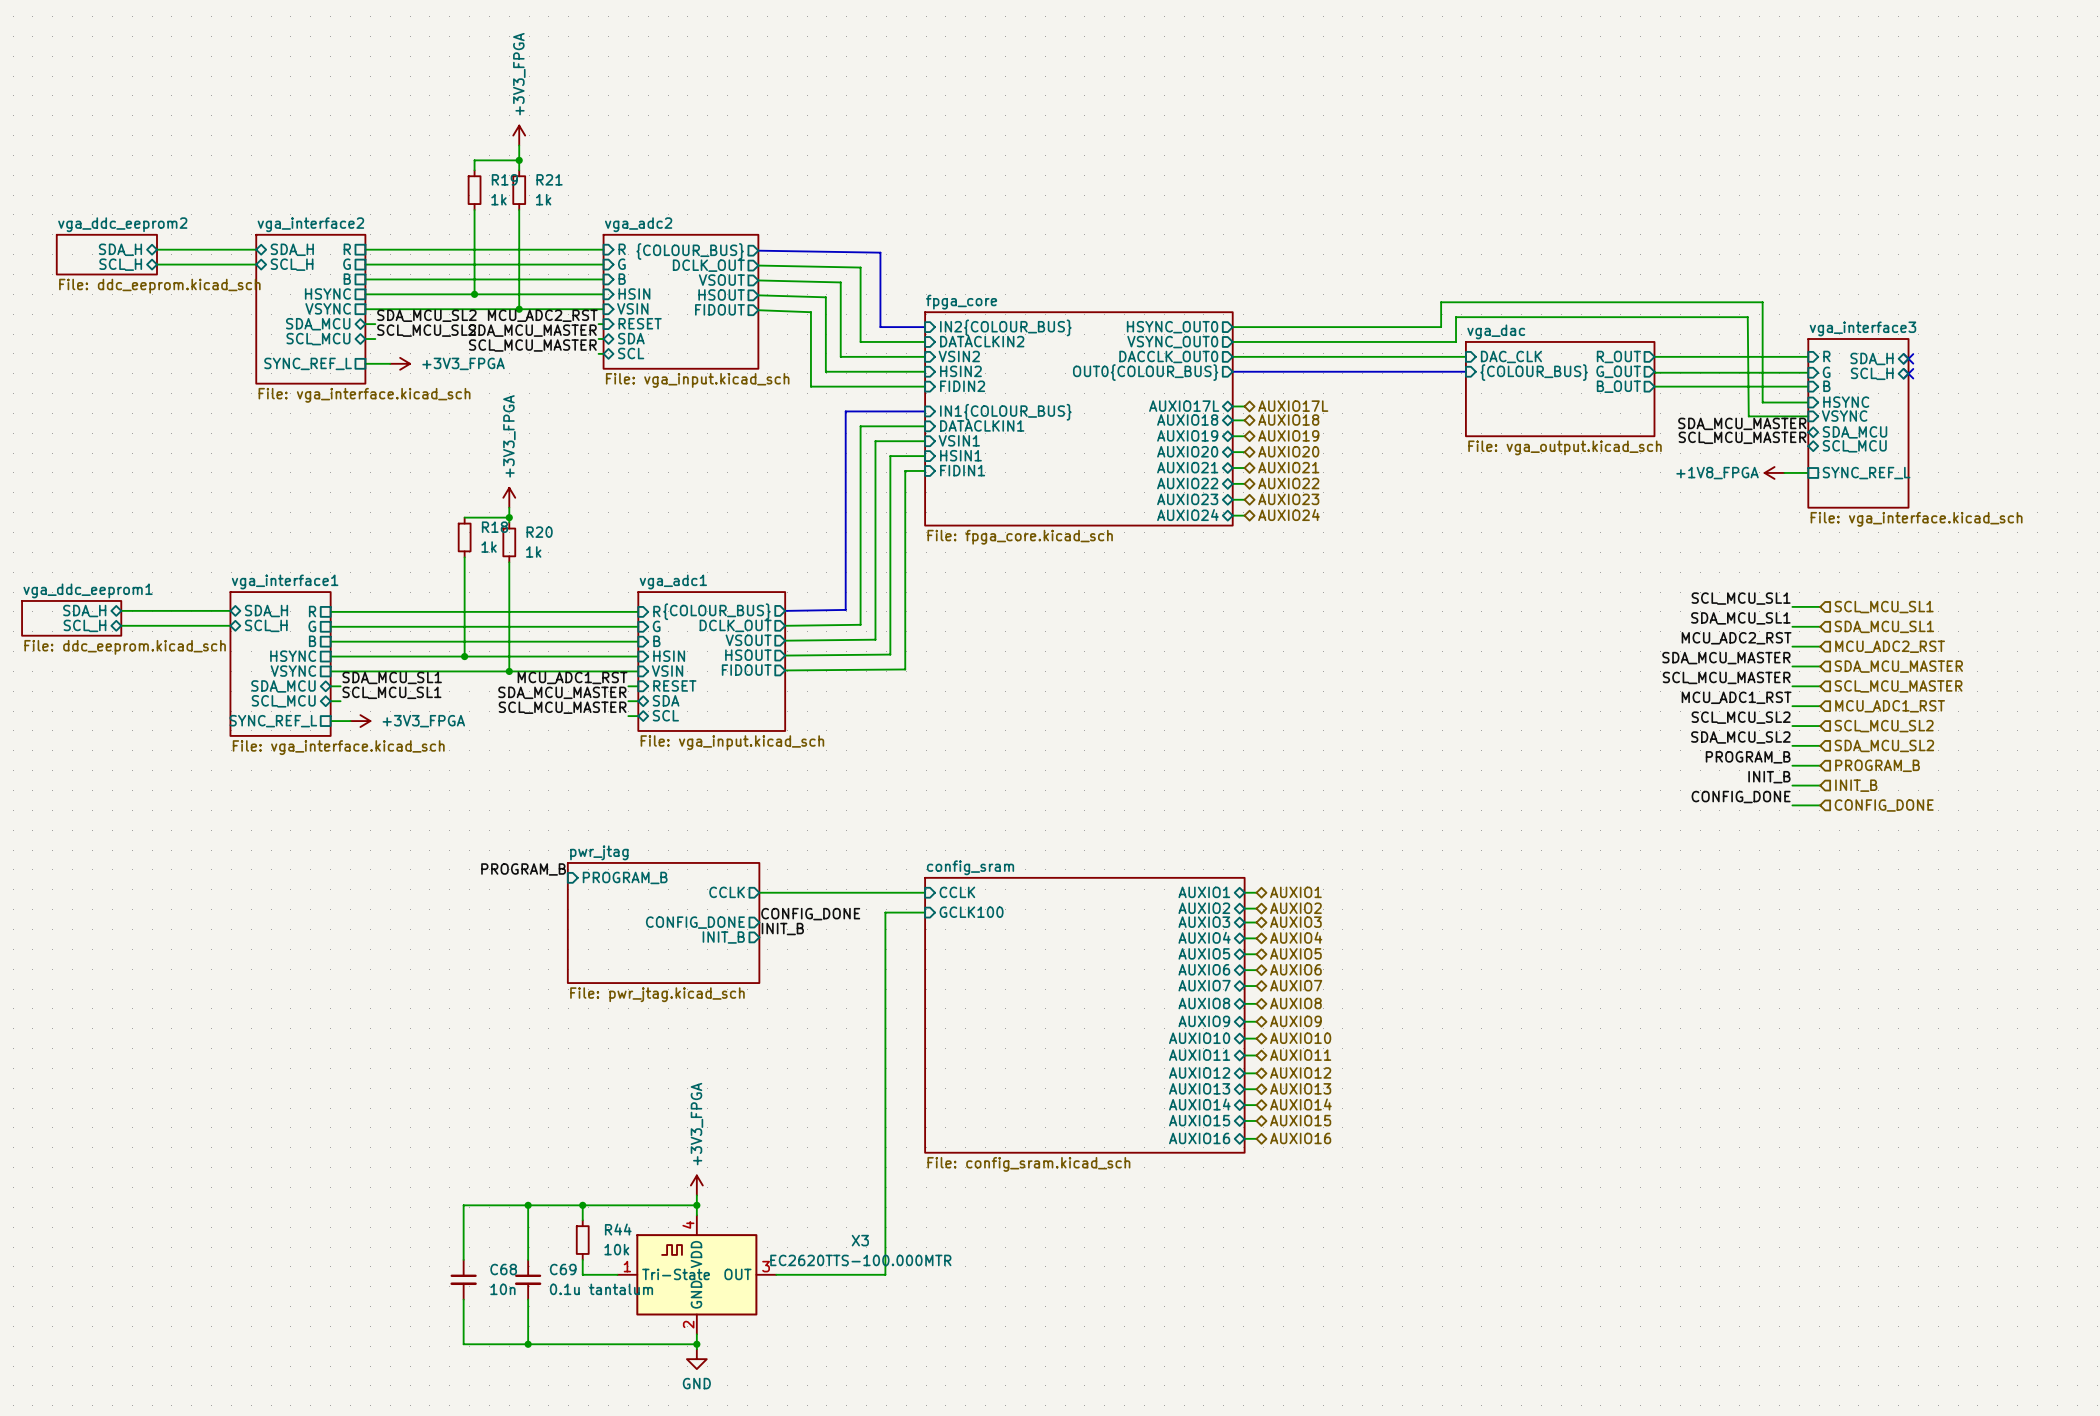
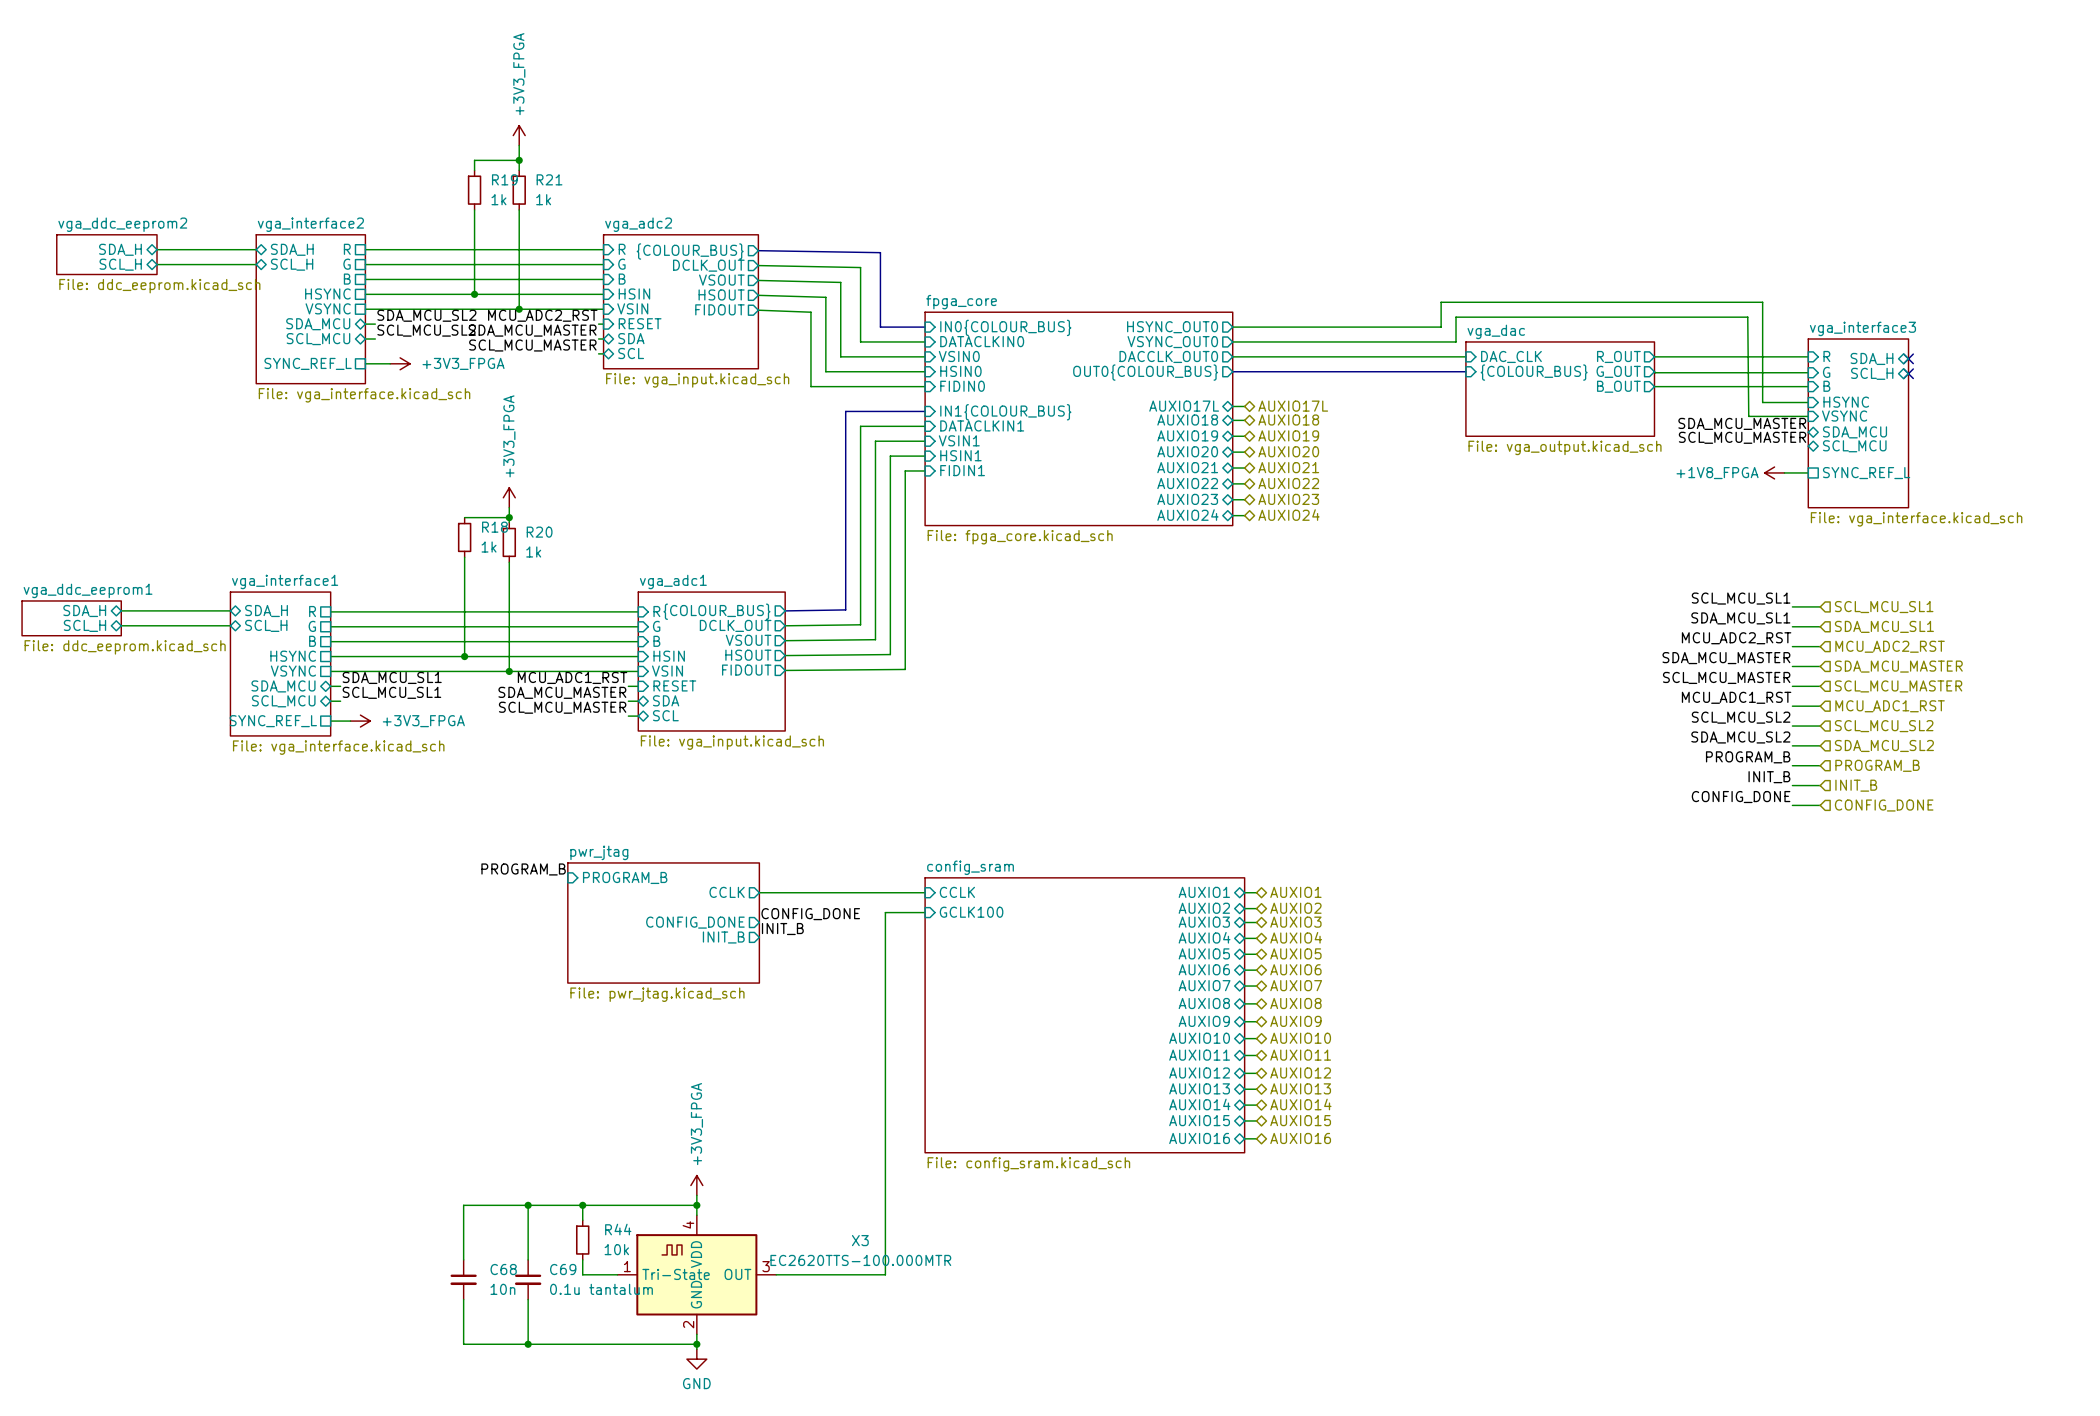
sheet pin: IN2{COLOUR_BUS} (1005, 327) -> IN0{COLOUR_BUS} (1005, 327)
sheet pin: DATACLKIN2 (982, 341) -> DATACLKIN0 (982, 341)
sheet pin: VSIN2 (959, 356) -> VSIN0 (959, 356)
sheet pin: HSIN2 (960, 371) -> HSIN0 (960, 371)
sheet pin: FIDIN2 (962, 386) -> FIDIN0 (962, 386)

